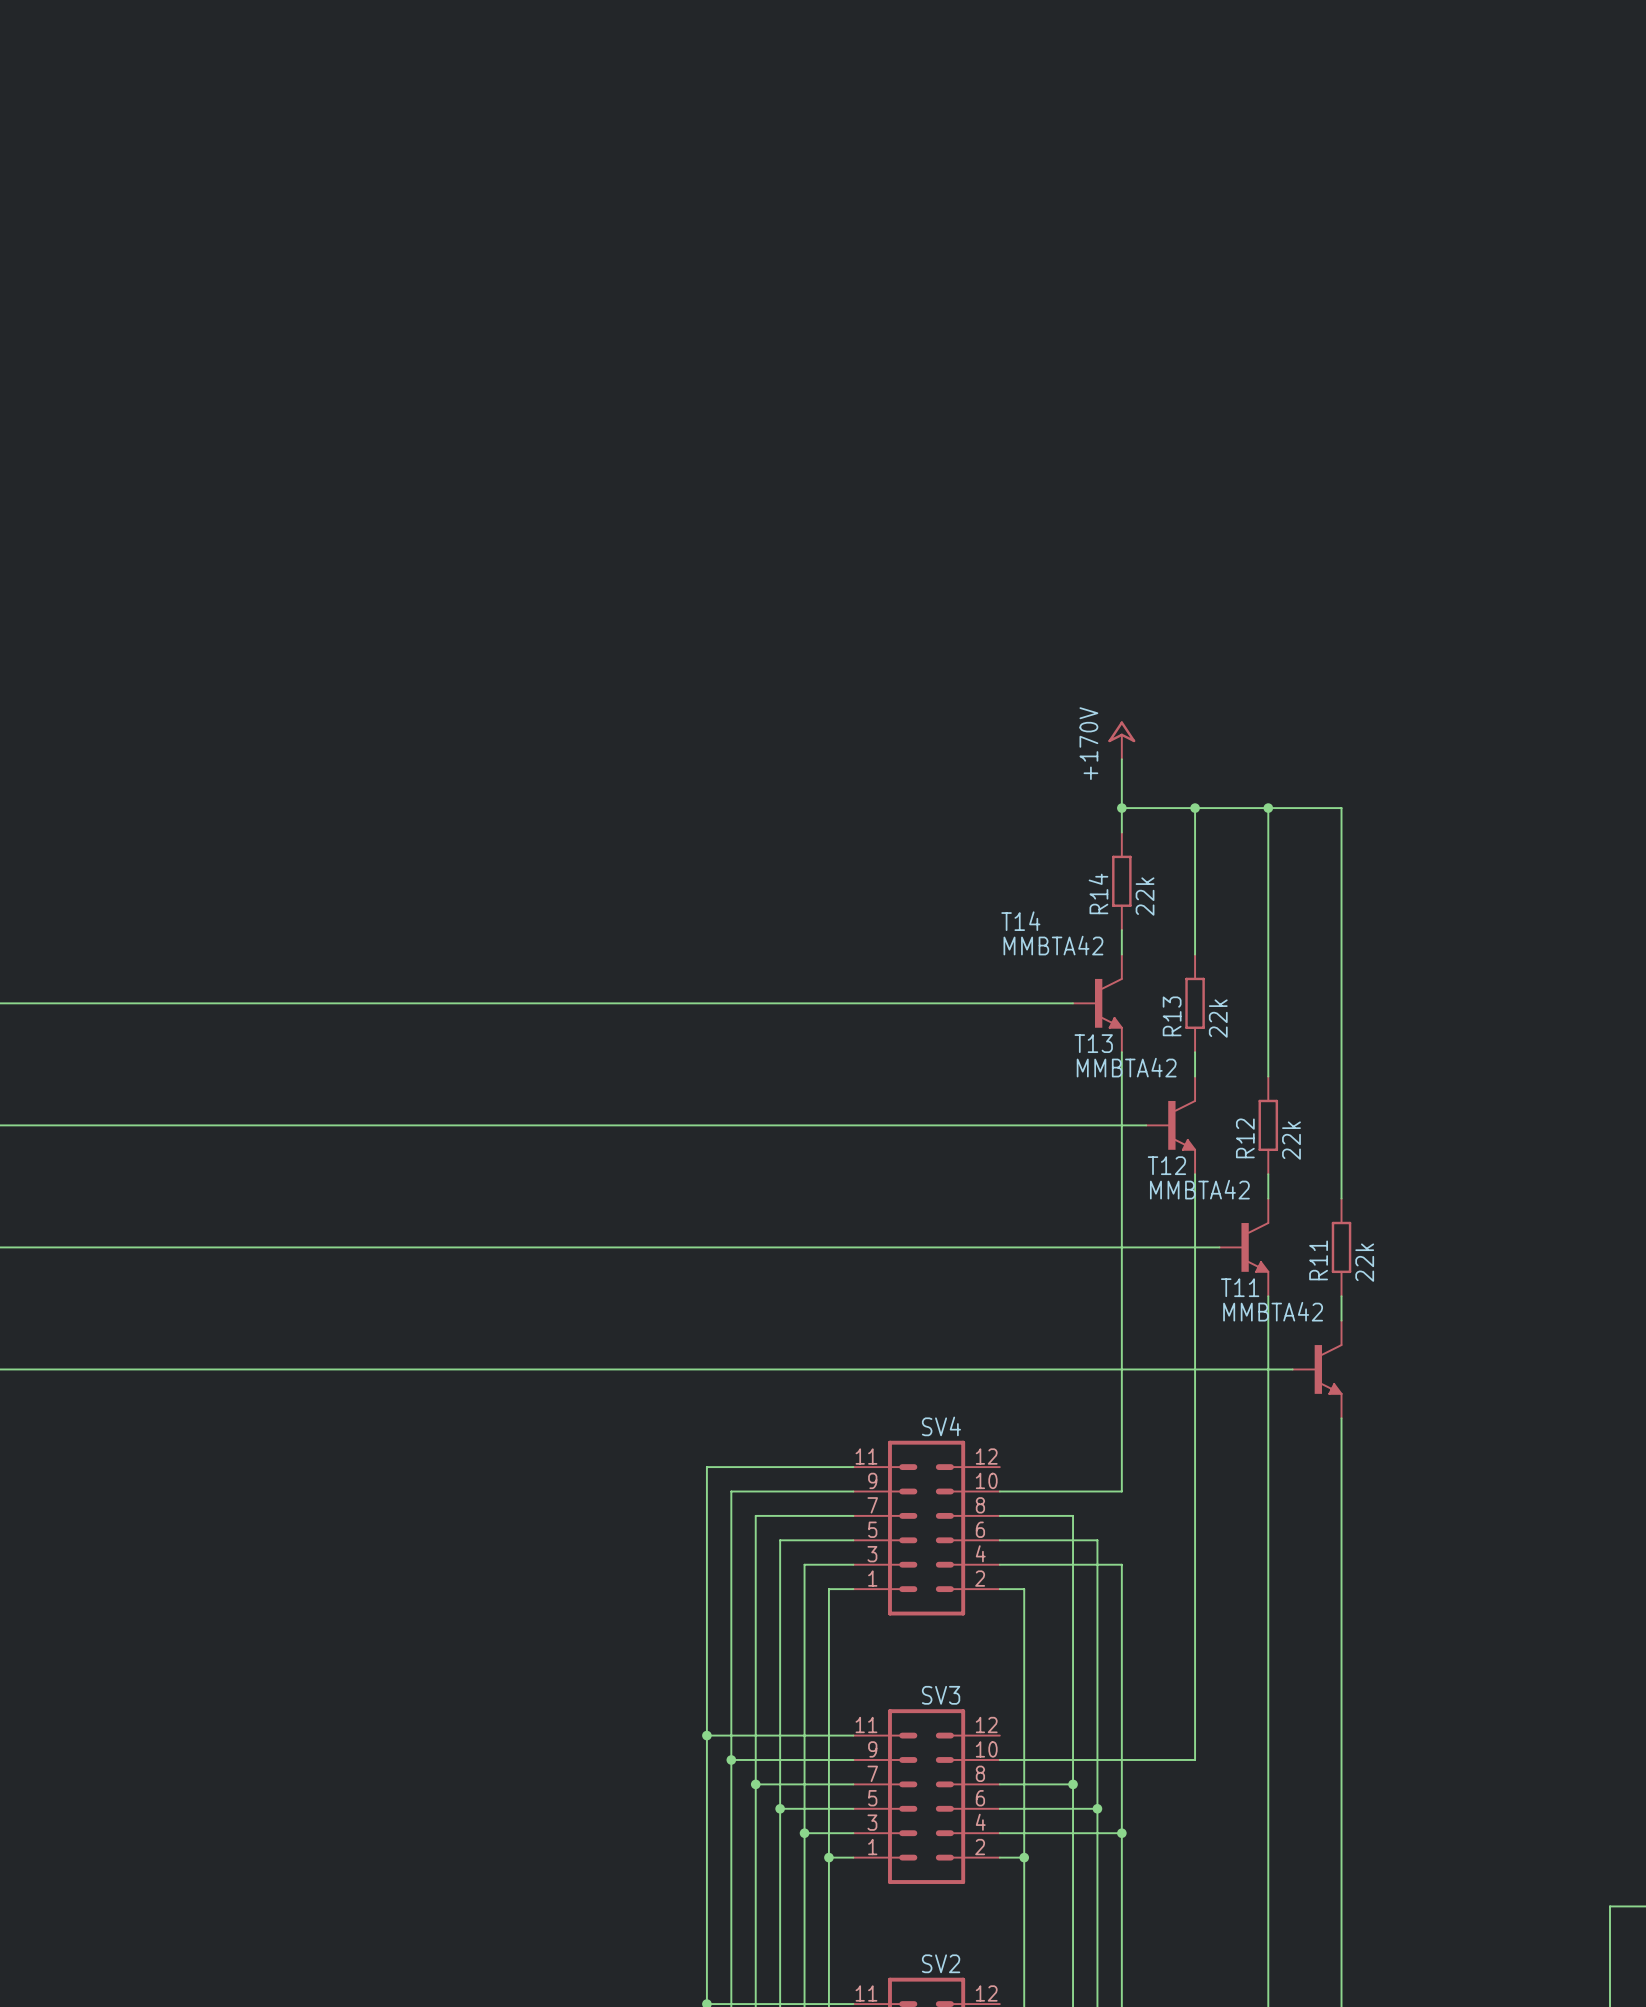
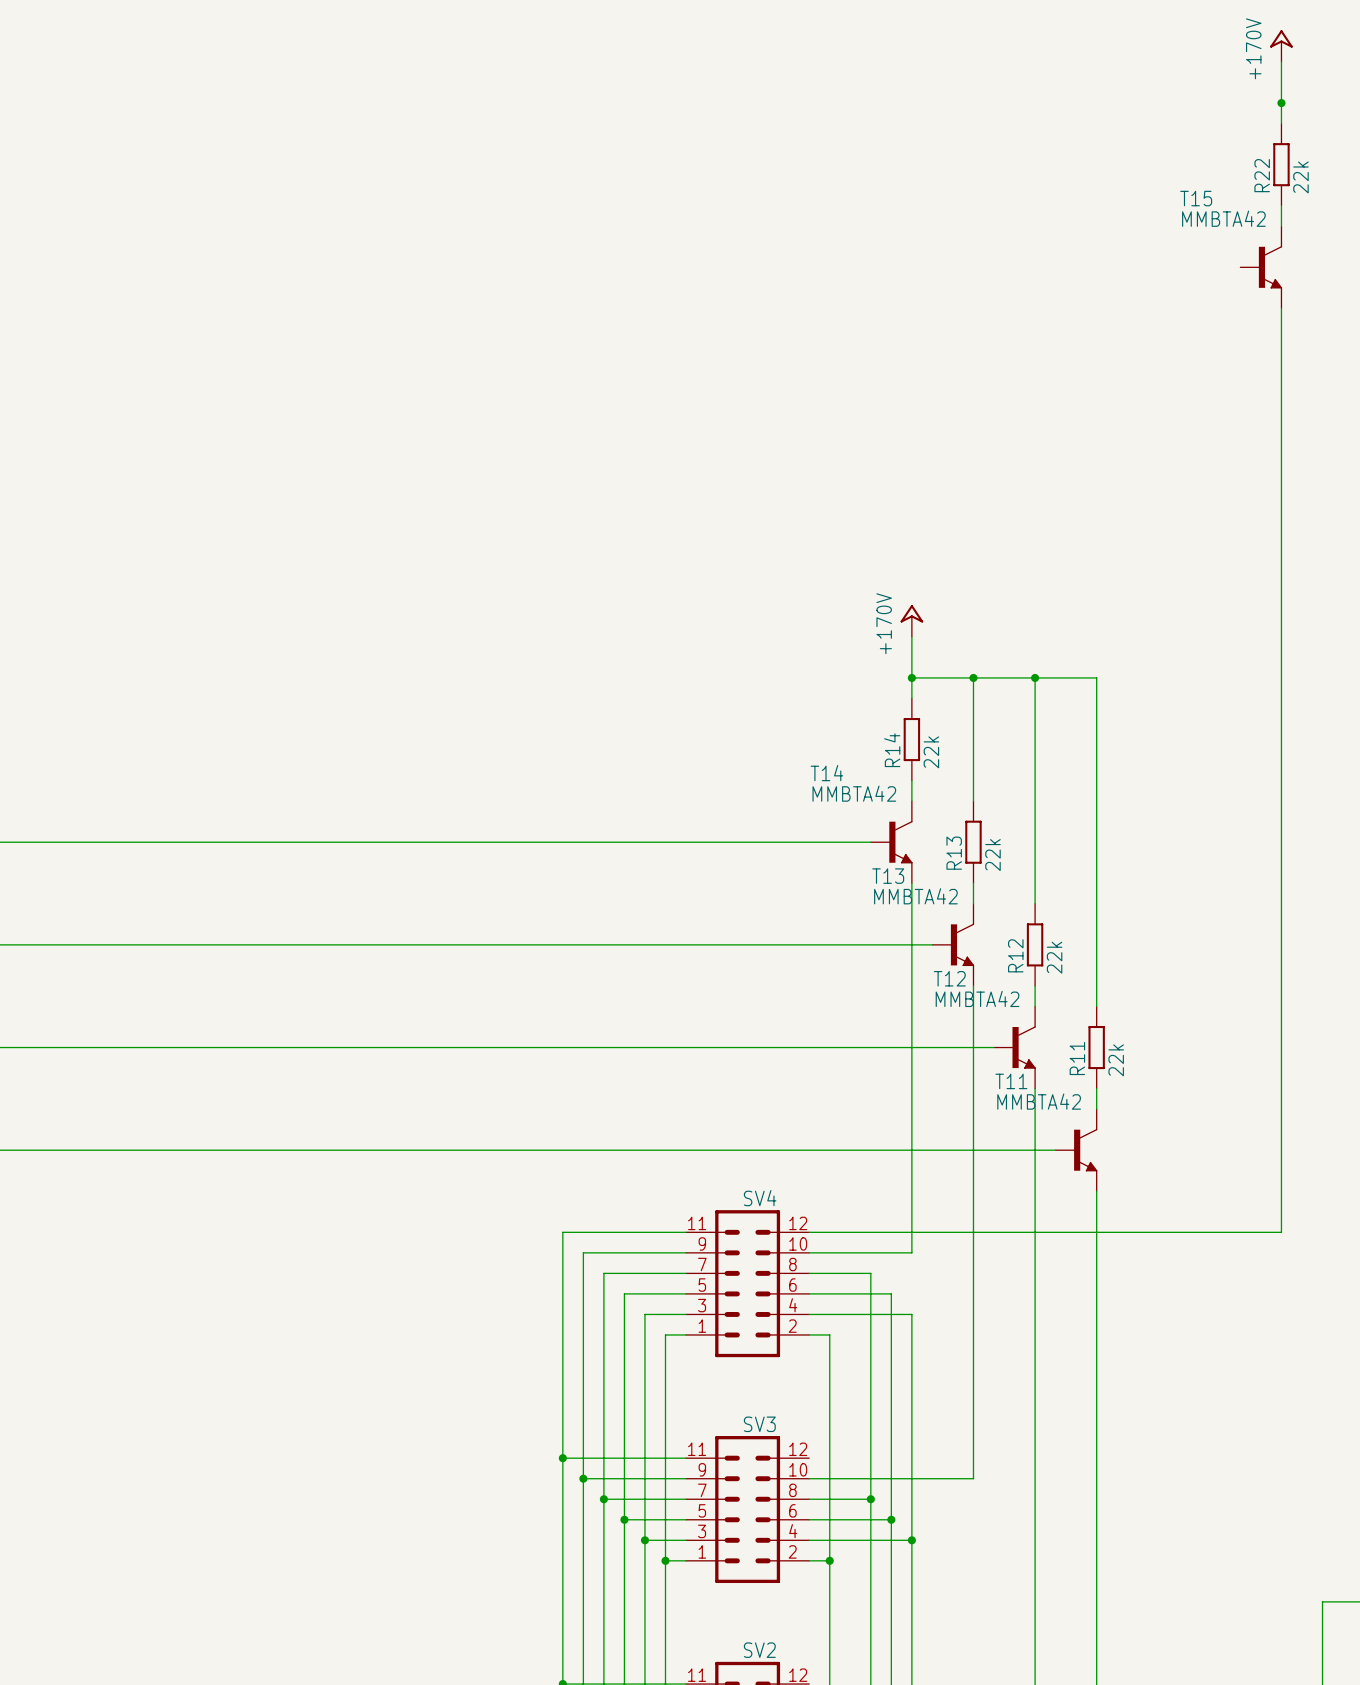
power symbol: none -> +170V (1281, 46)
wire: none -> (1281, 62) (1281, 123)
junction: none -> (1281, 103)
R22: none -> 22k (1281, 164)
wire: none -> (1281, 205) (1281, 226)
T15: none -> MMBTA42 (1261, 267)
wire: none -> (1281, 308) (1281, 1232) (809, 1232)

